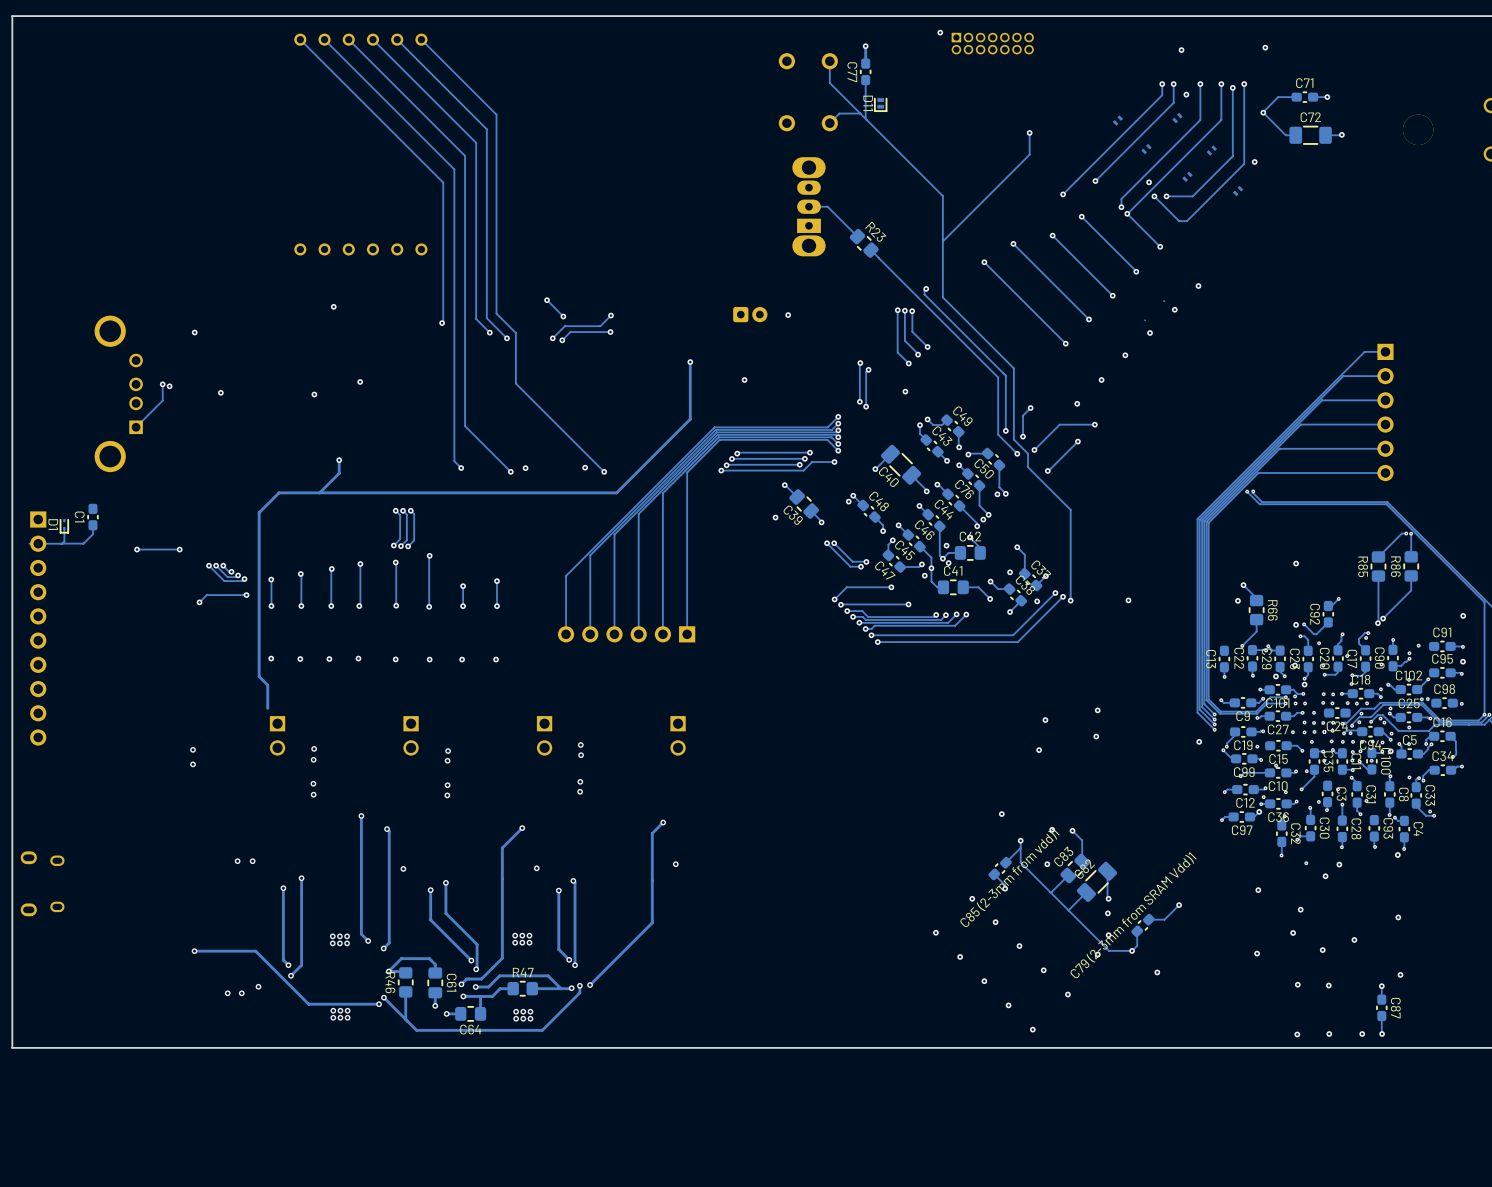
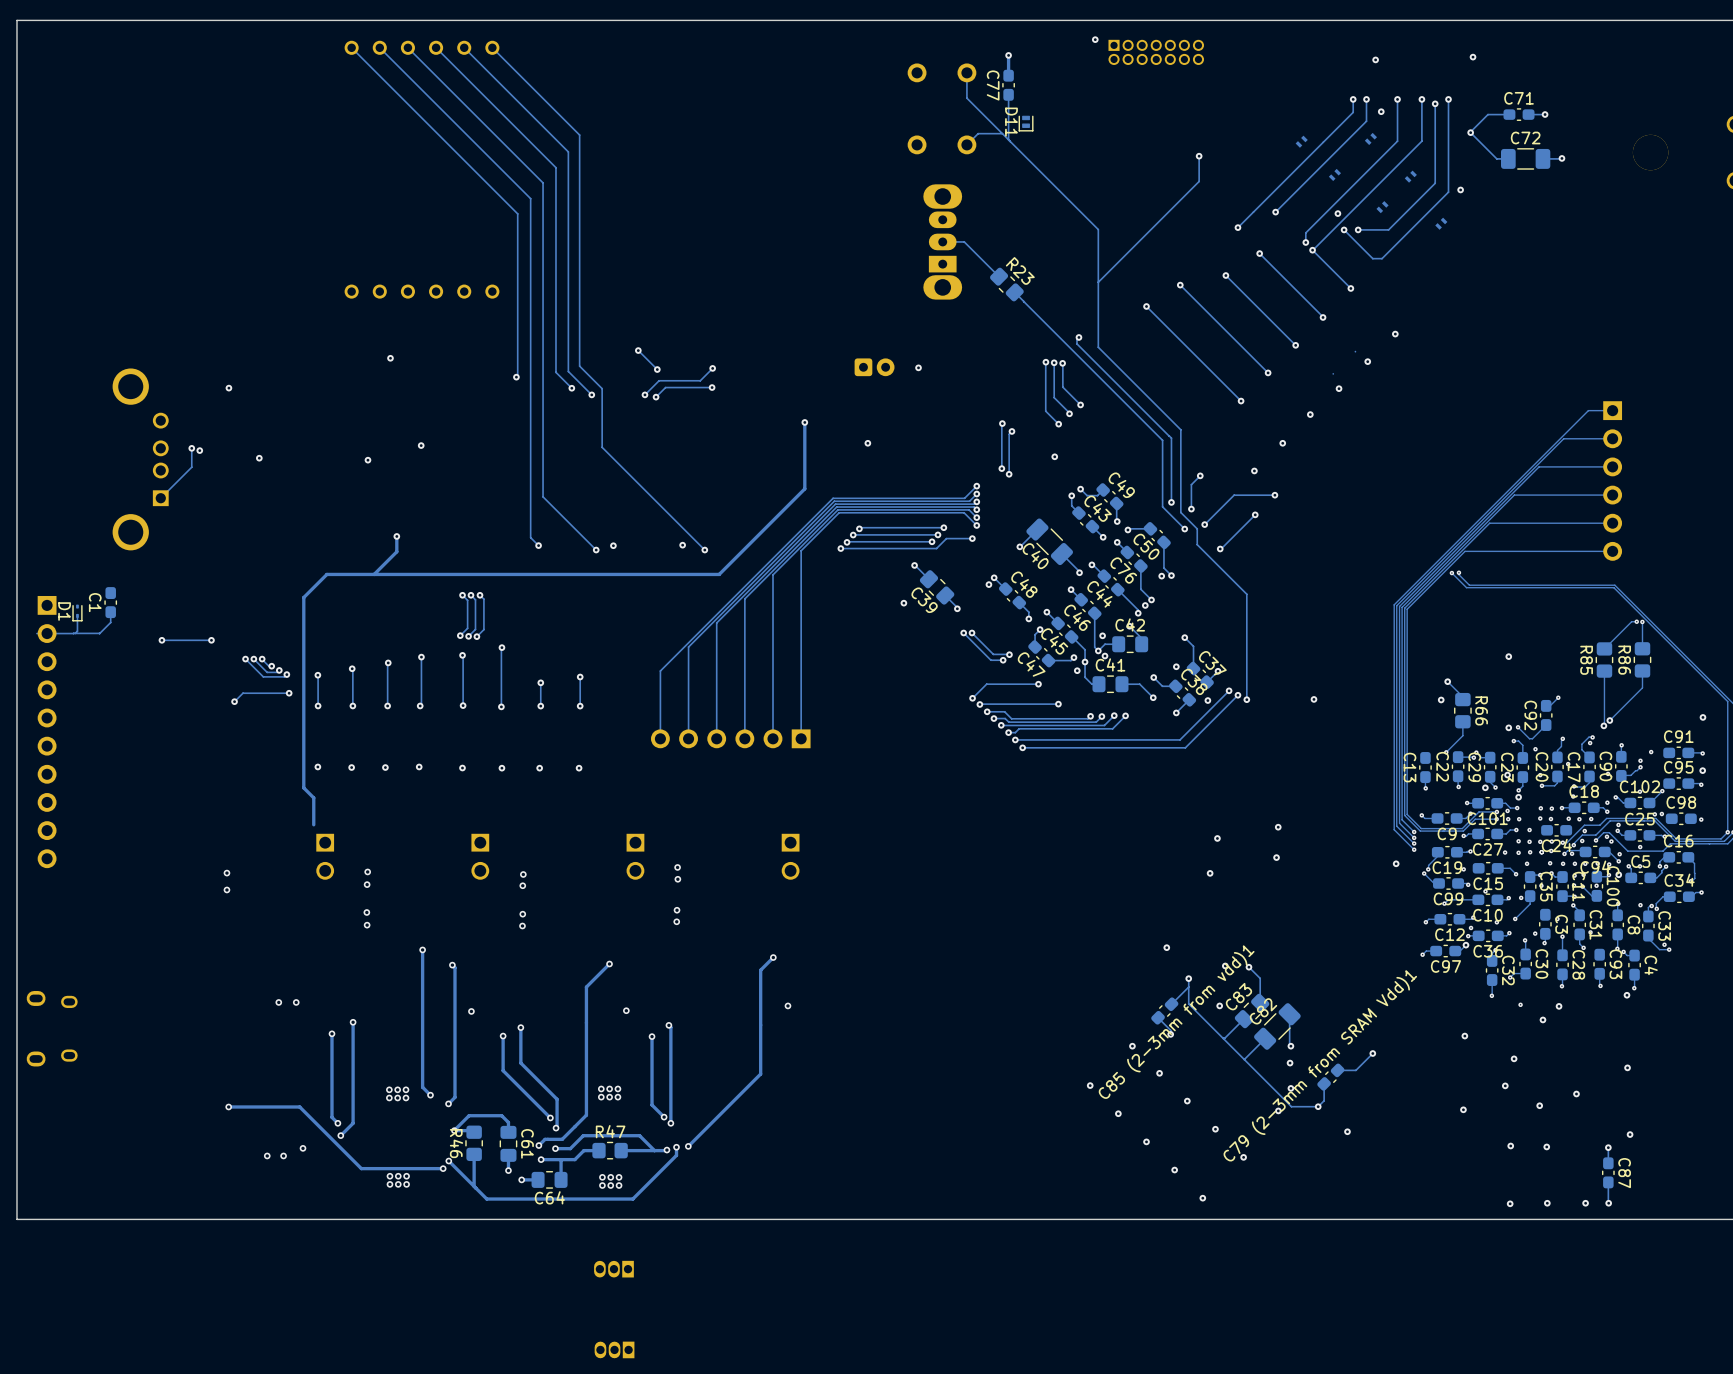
part: none -> (613, 1269)
part: none -> (614, 1349)

